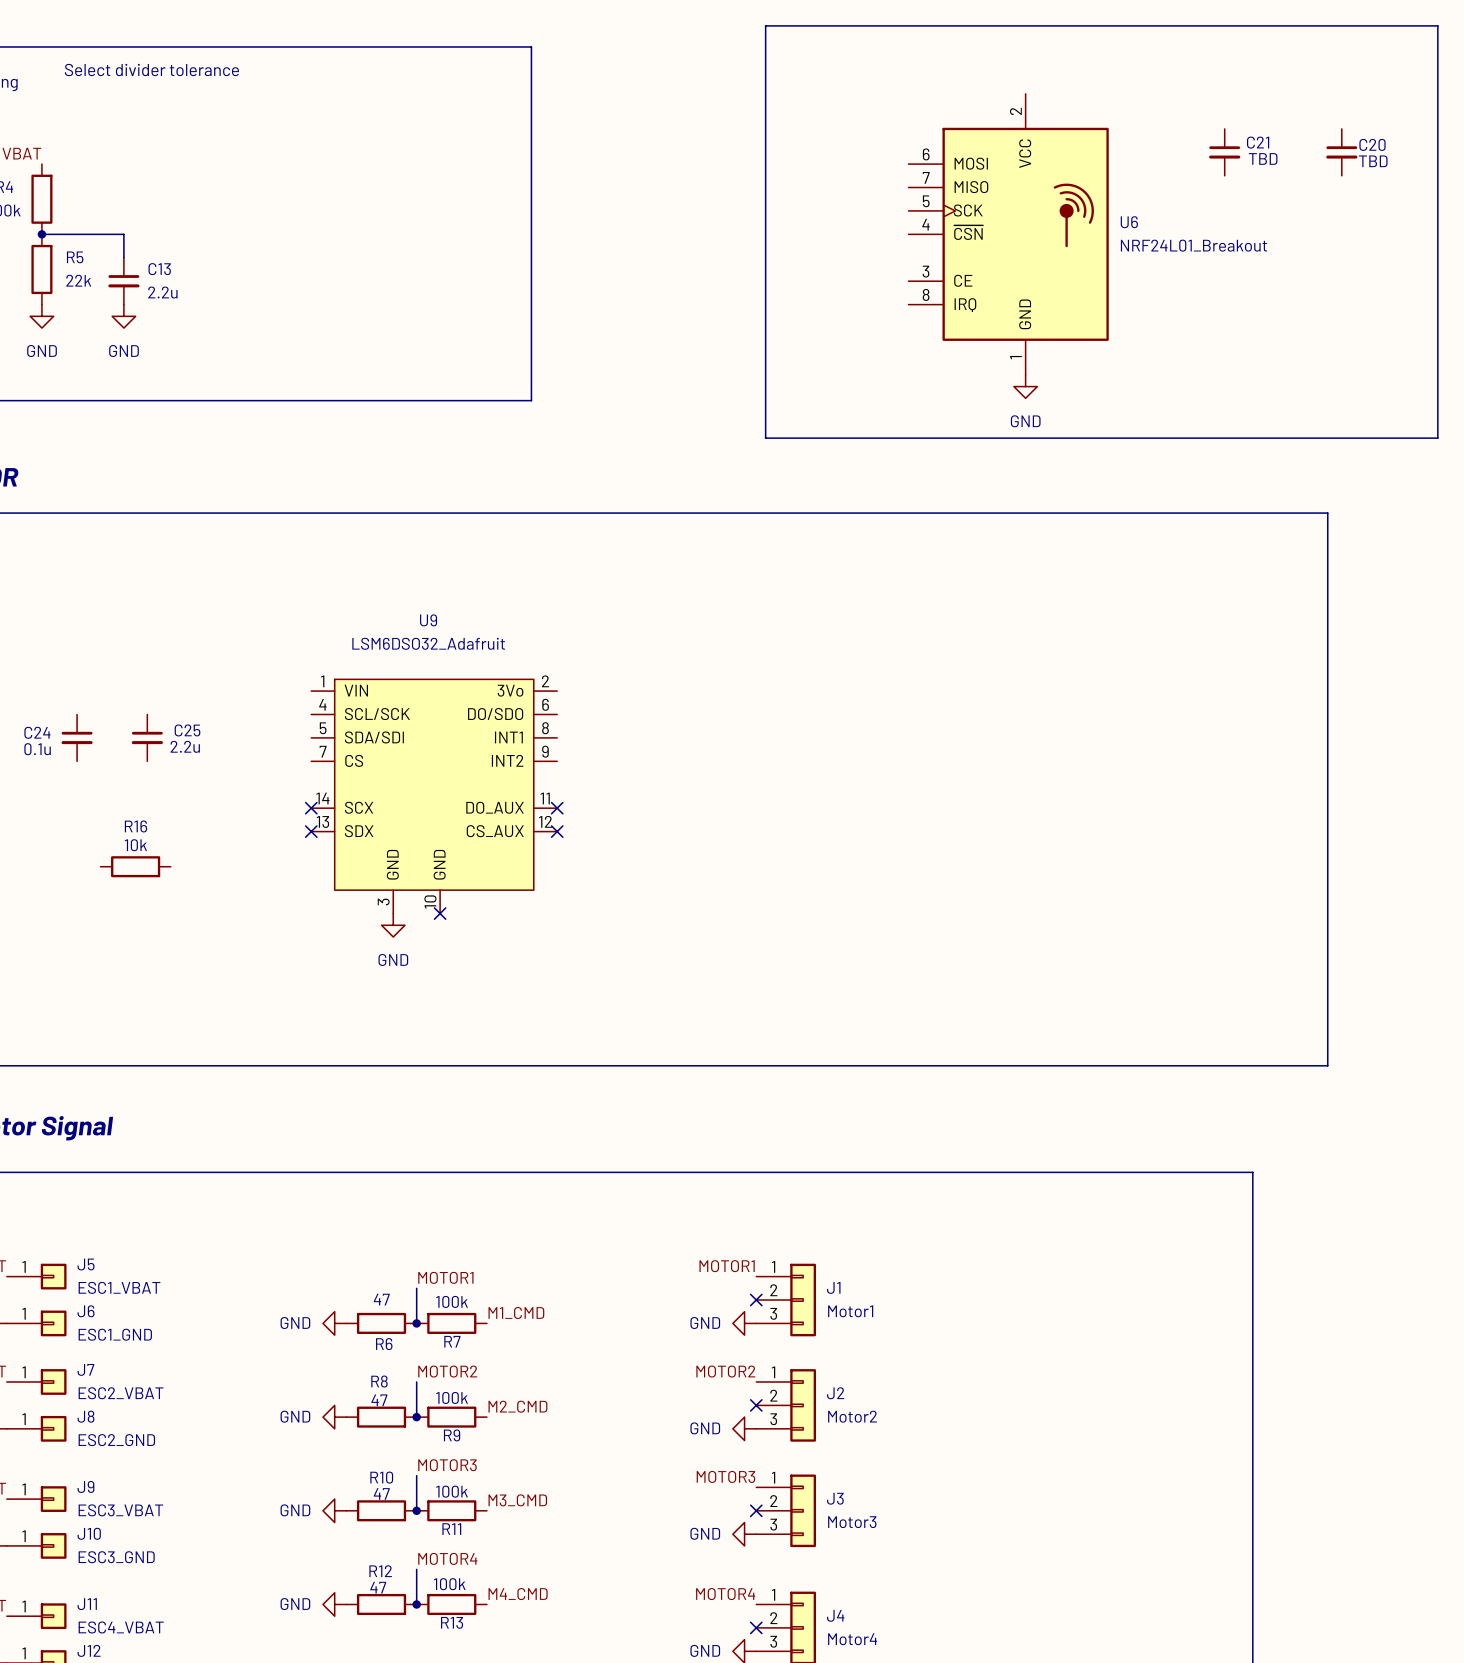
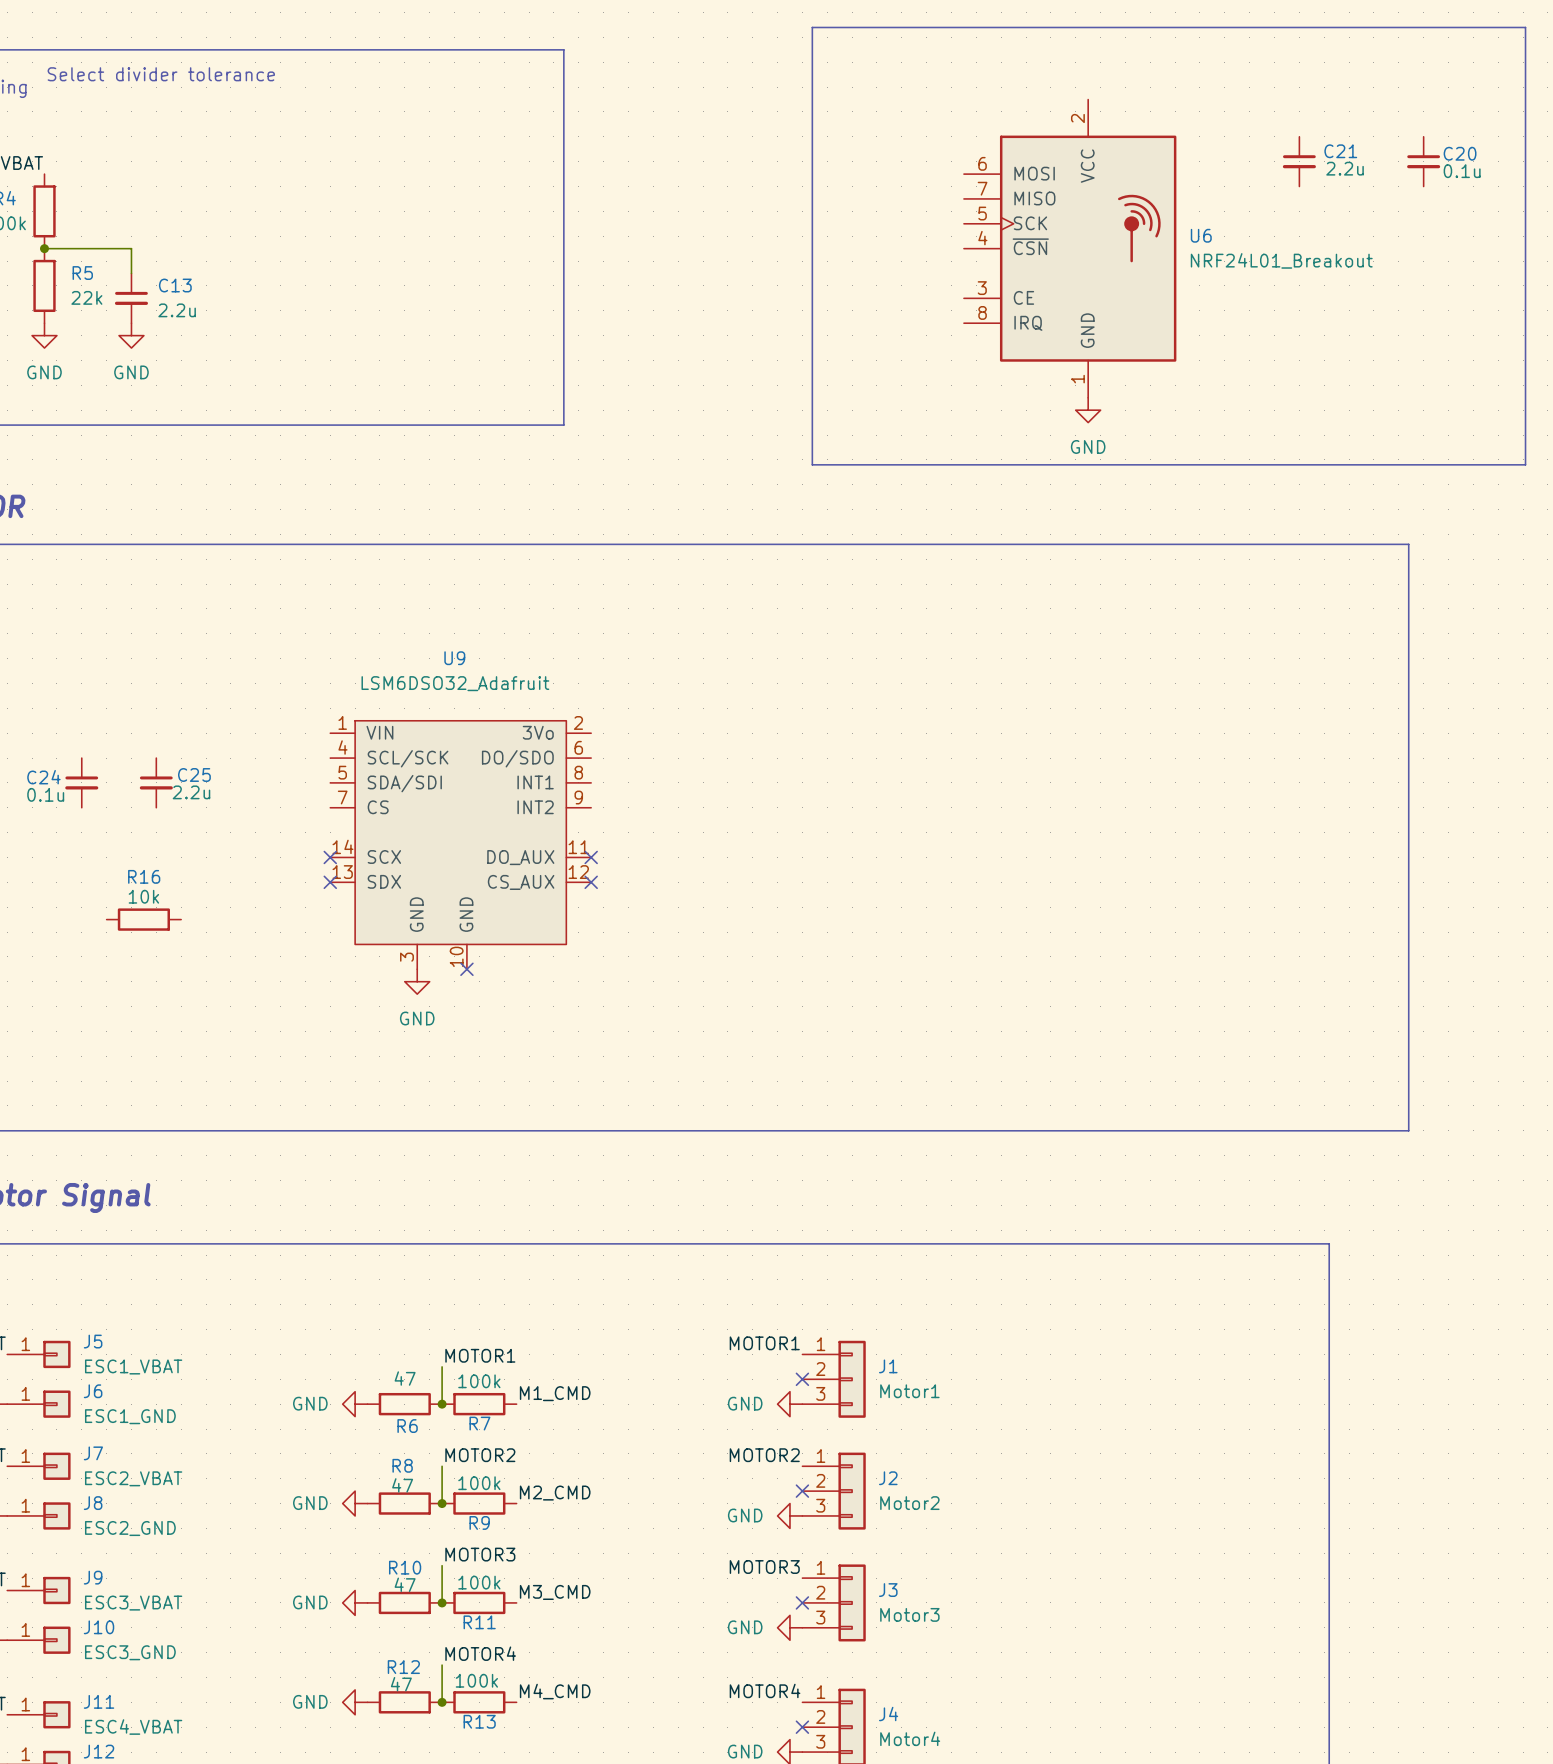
C21 value: TBD (1263, 158) -> 2.2u (1345, 168)
C20 value: TBD (1373, 161) -> 0.1u (1462, 171)

